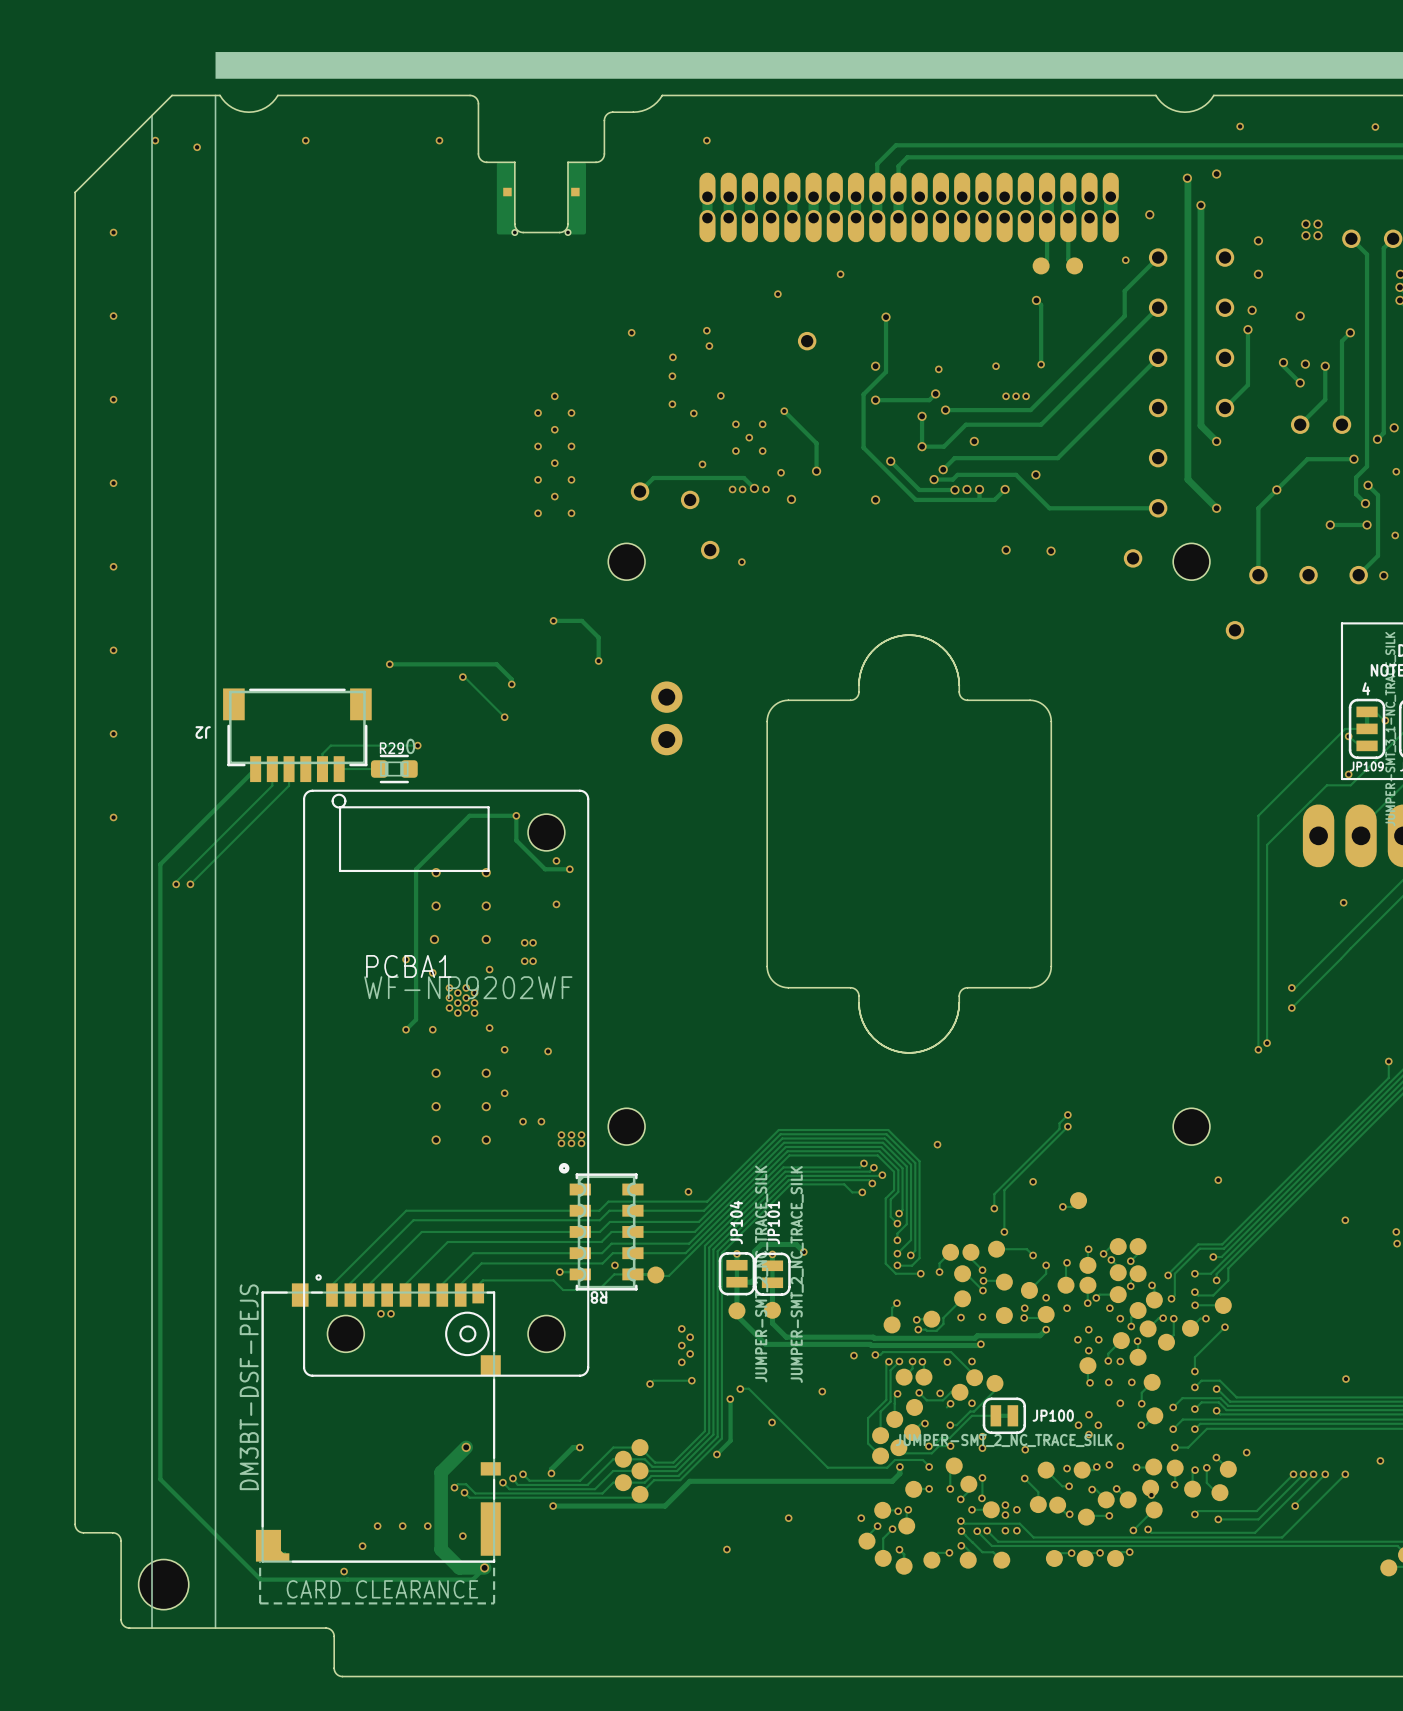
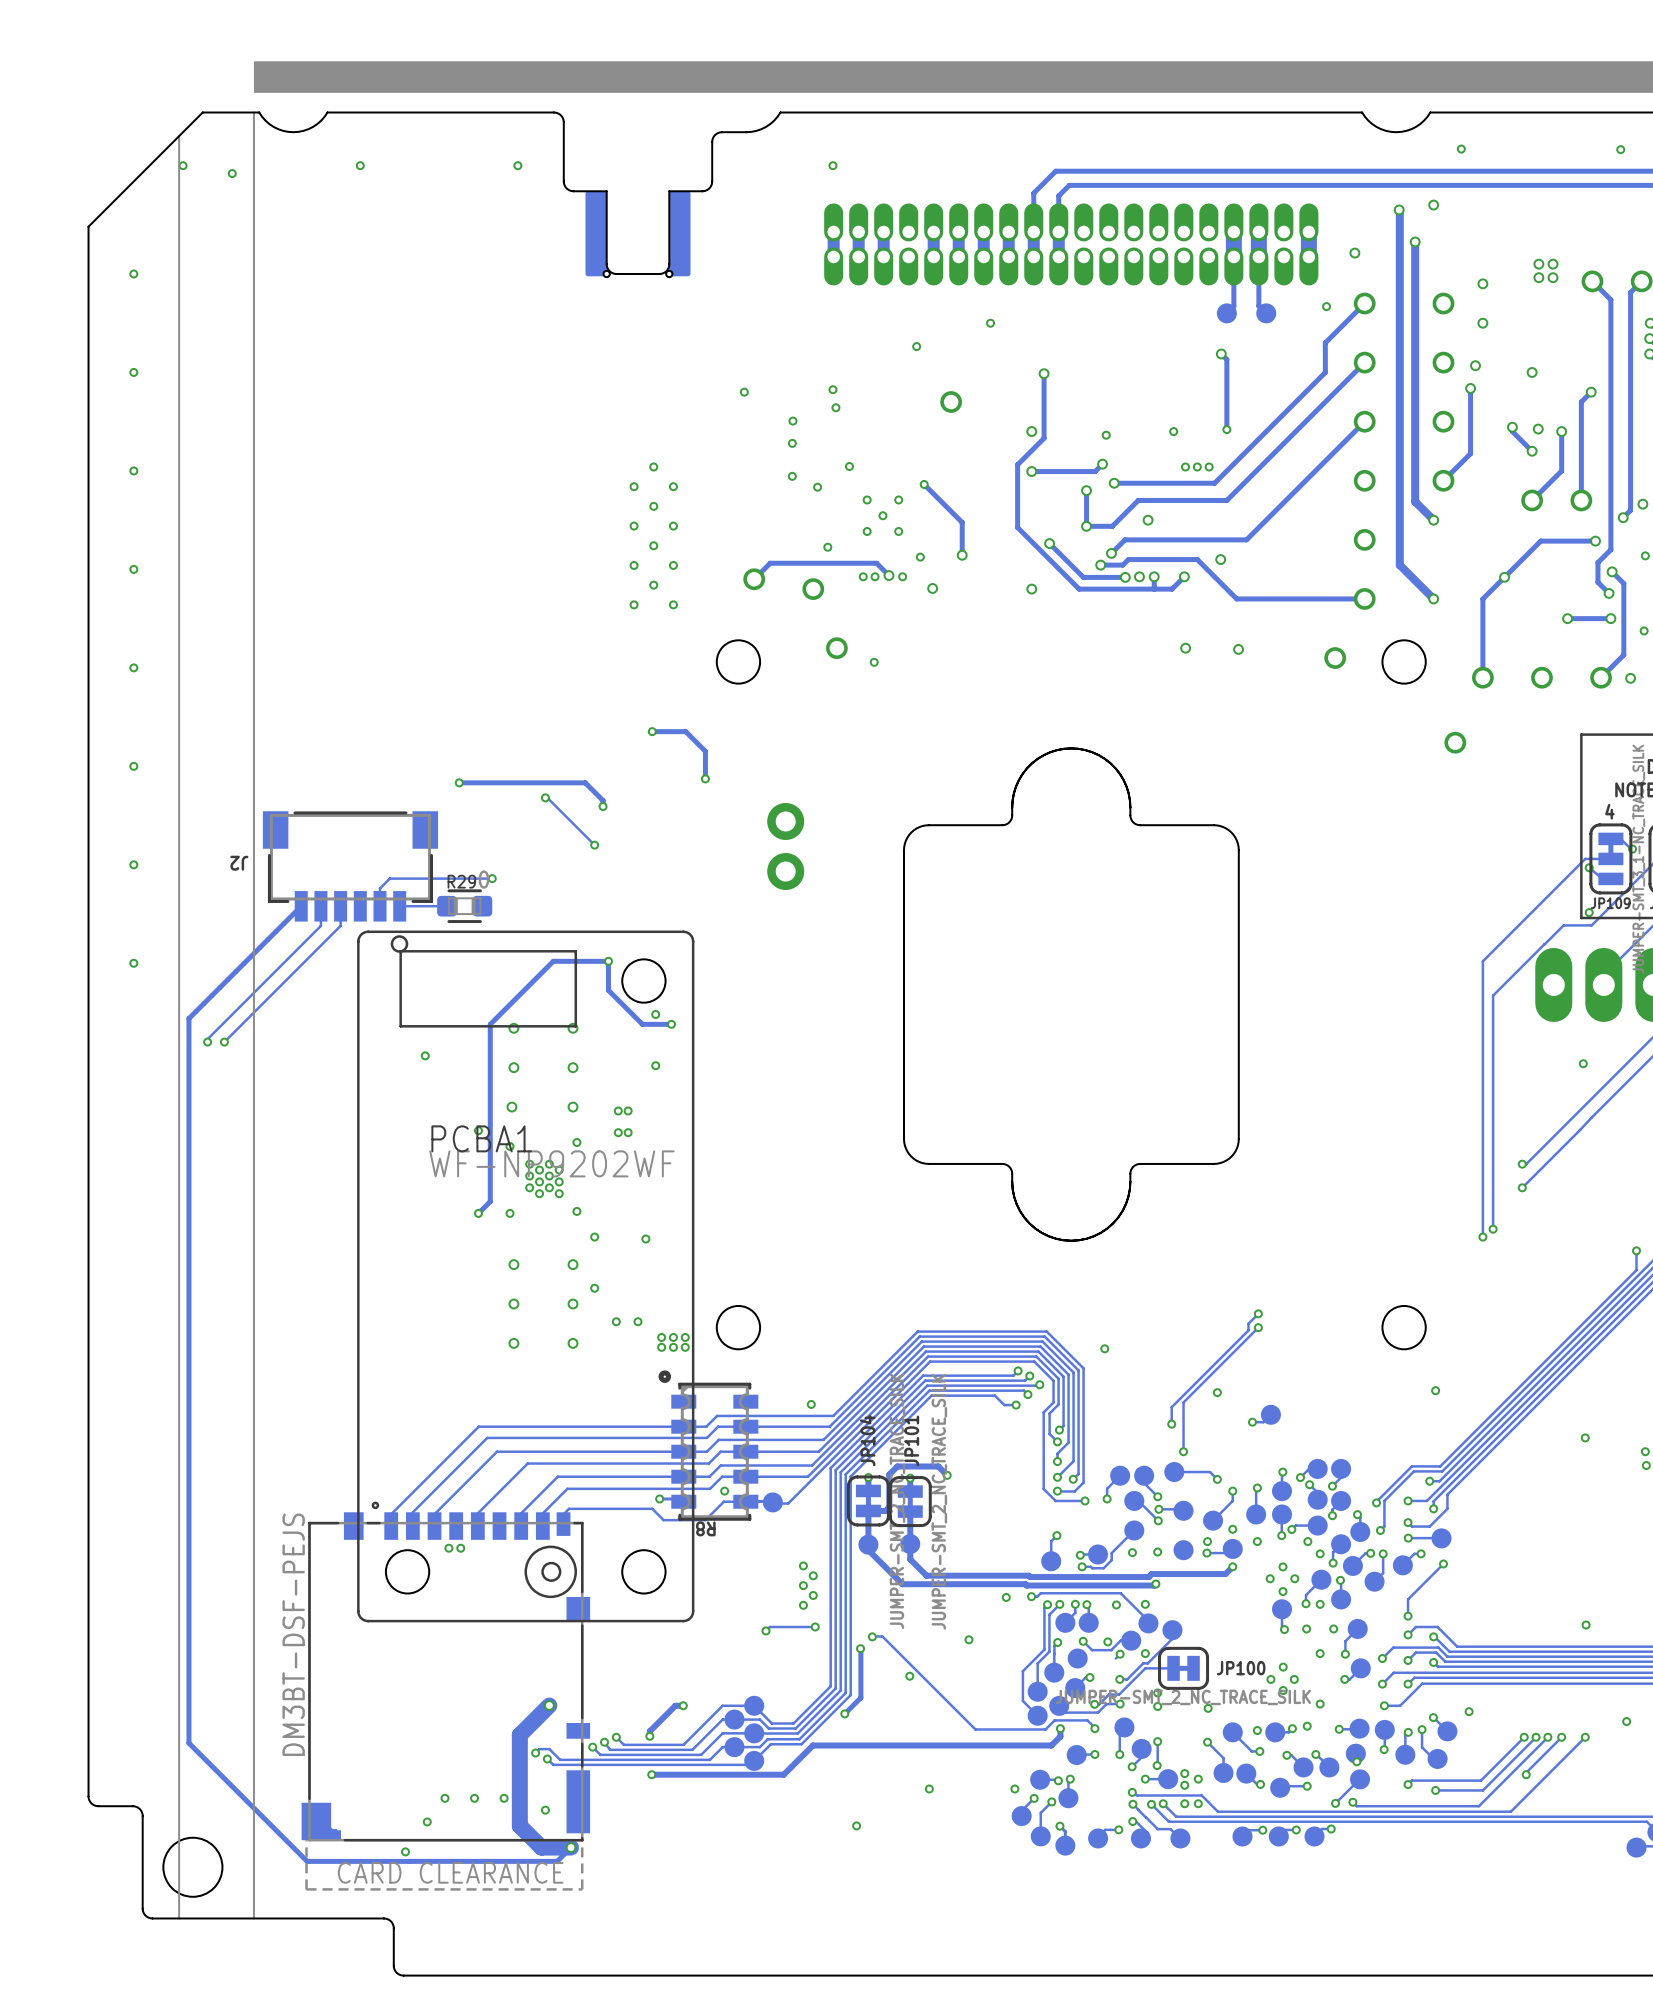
via: none -> (425, 1055)

